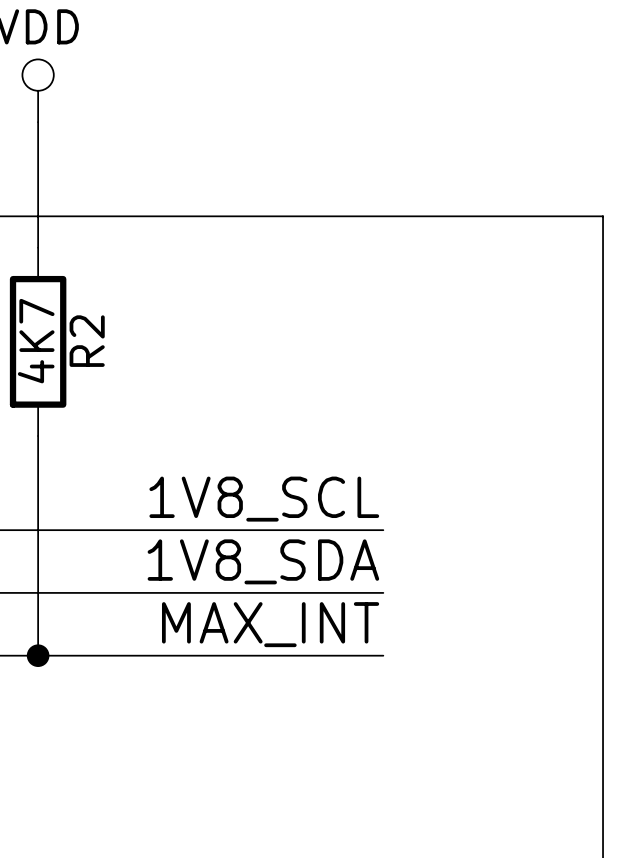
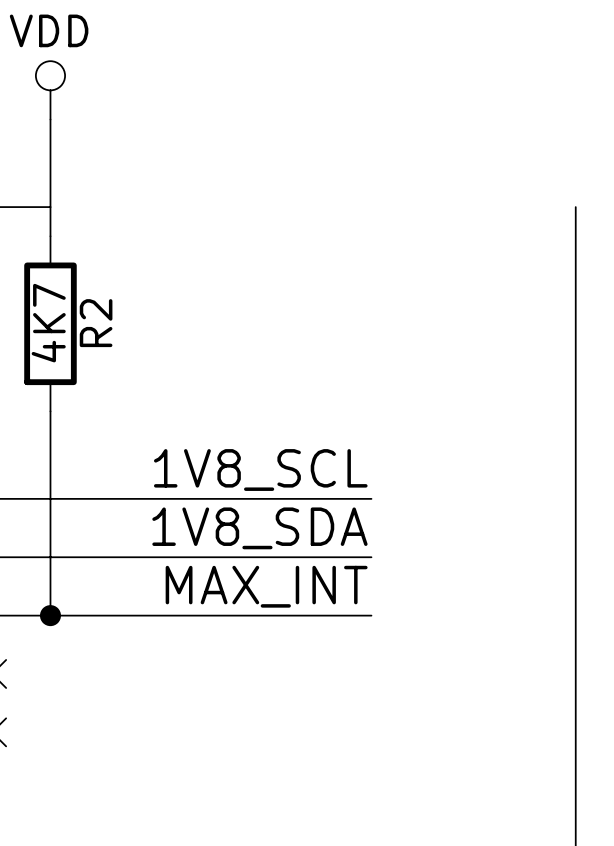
wire: (38, 216) (603, 216) -> none

